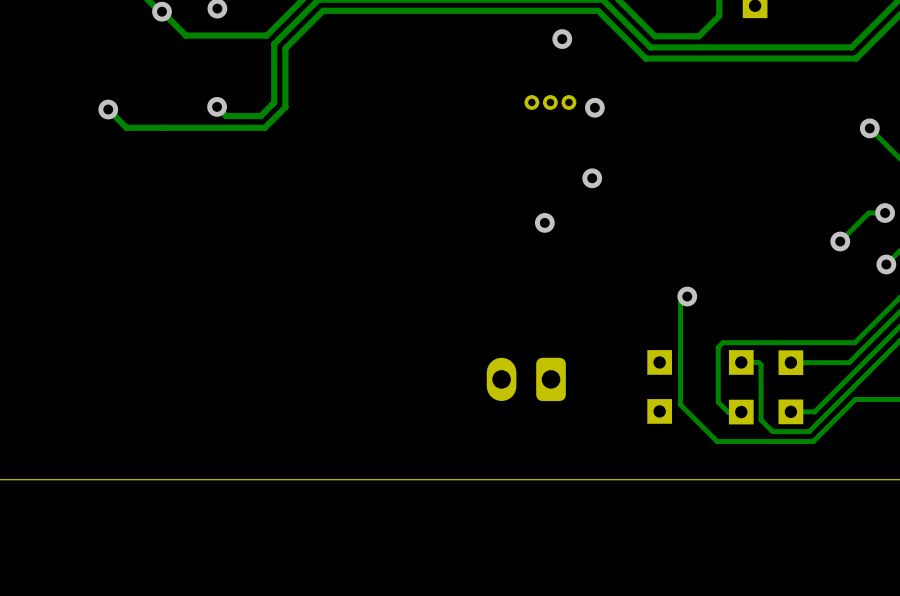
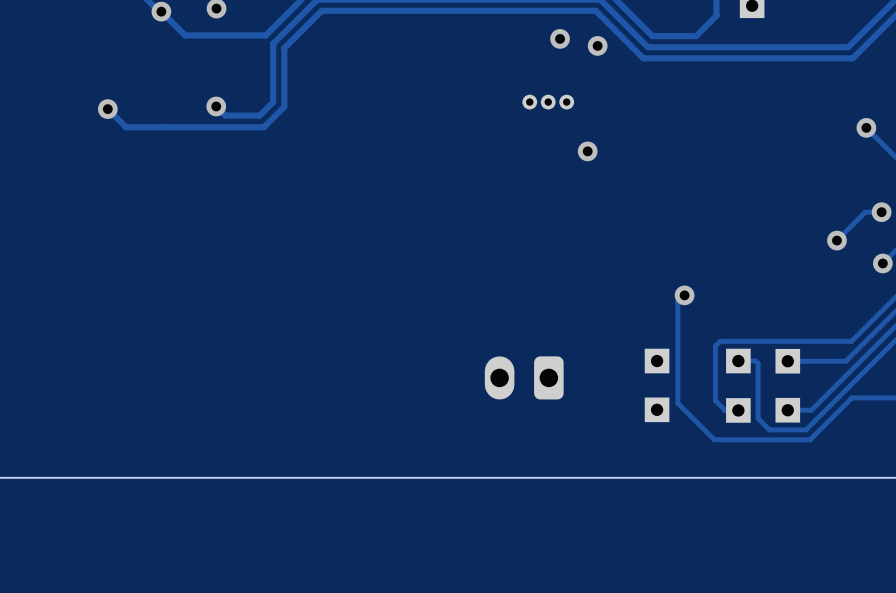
via: none -> (597, 45)
via: (594, 107) -> none
via: none -> (587, 151)
via: (592, 178) -> none
via: (544, 222) -> none

